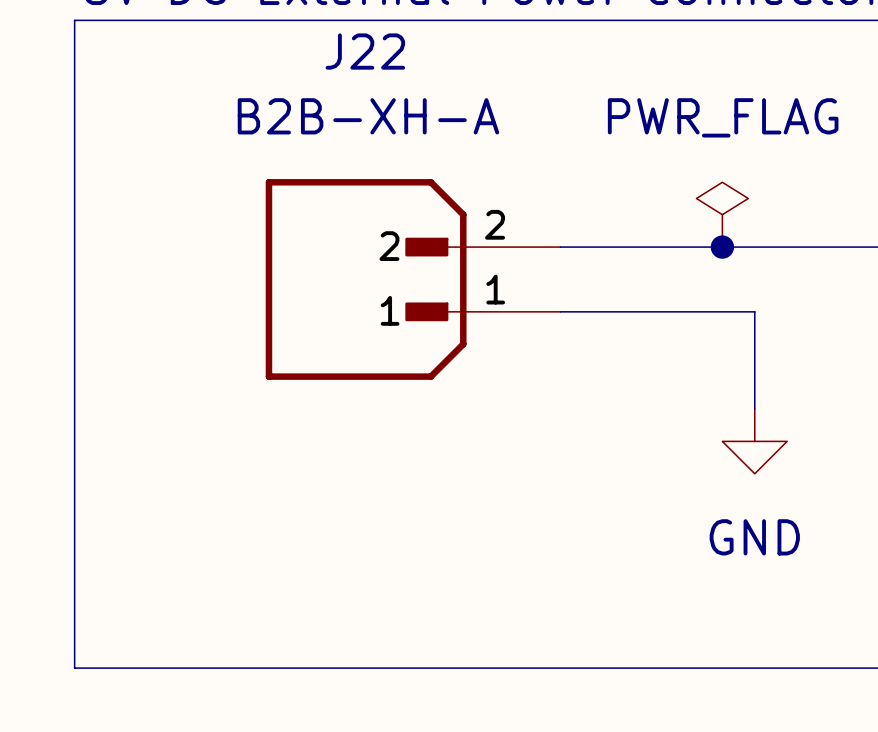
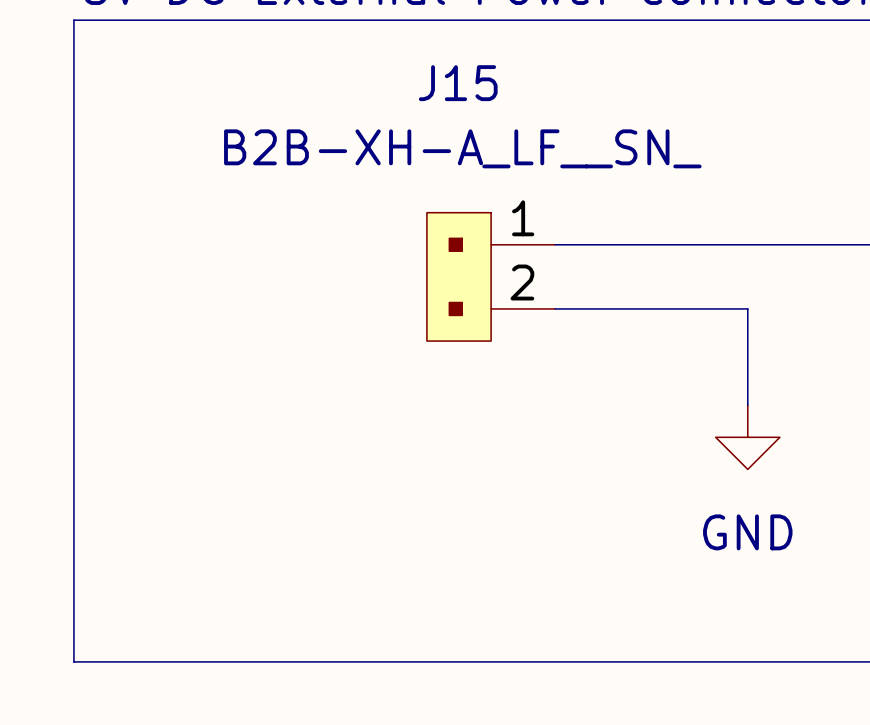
power symbol: PWR_FLAG (722, 214) -> none
junction: (722, 247) -> none
J22: B2B-XH-A (413, 279) -> none
J15: none -> B2B-XH-A_LF__SN_ (491, 276)

